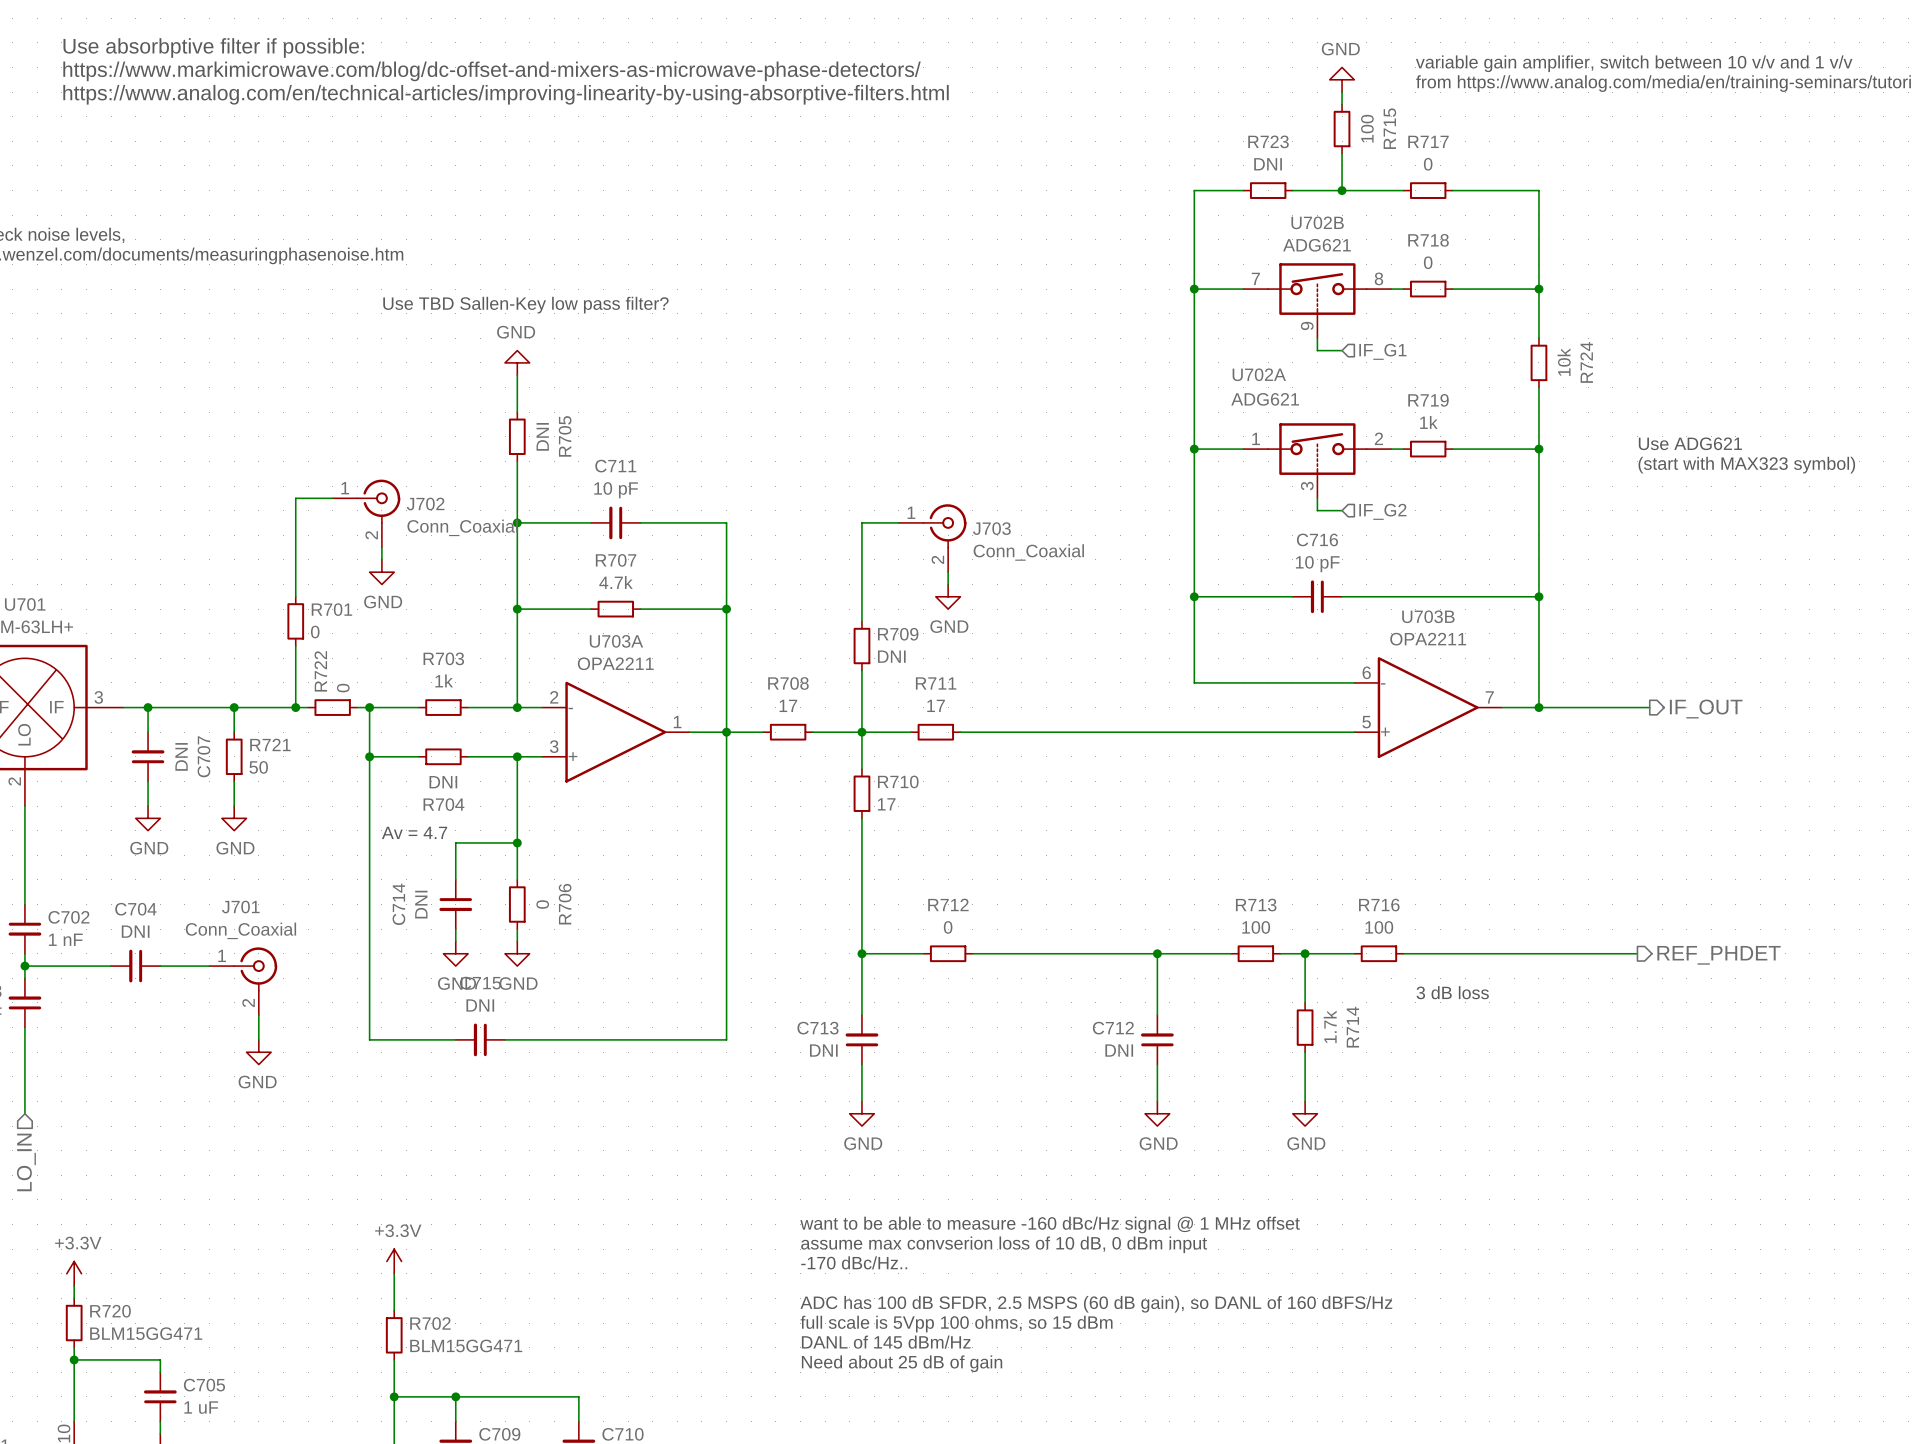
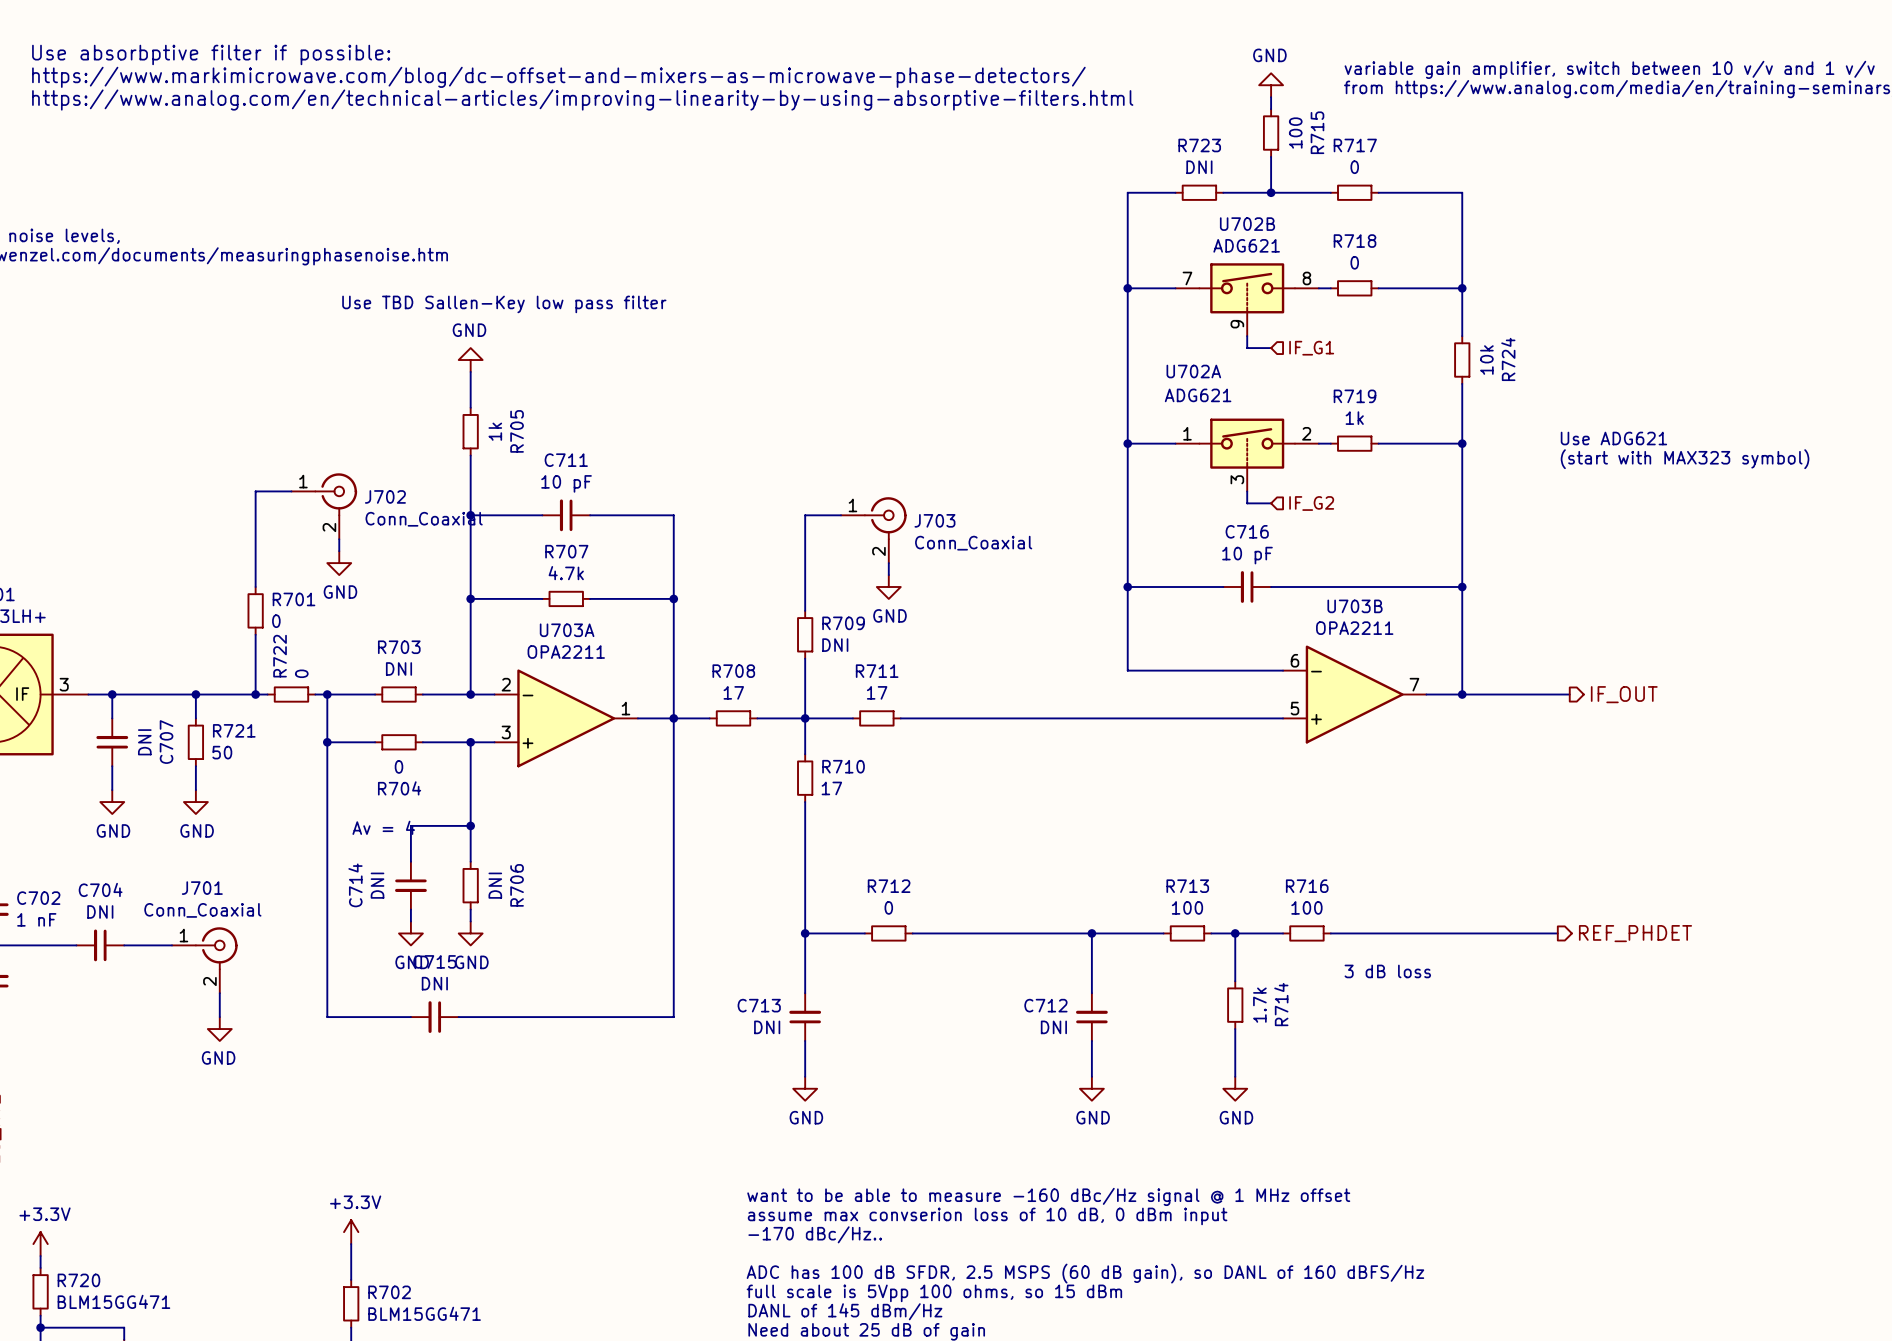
text: Use TBD Sallen-Key low pass filter? (525, 305) -> Use TBD Sallen-Key low pass filter (504, 304)
R705 value: DNI (542, 436) -> 1k (495, 431)
R703 value: 1k (444, 680) -> DNI (398, 668)
R704 value: DNI (443, 782) -> 0 (398, 766)
text: Av = 4.7 (414, 832) -> Av = 4 (383, 827)
R706 value: 0 (542, 904) -> DNI (495, 885)

